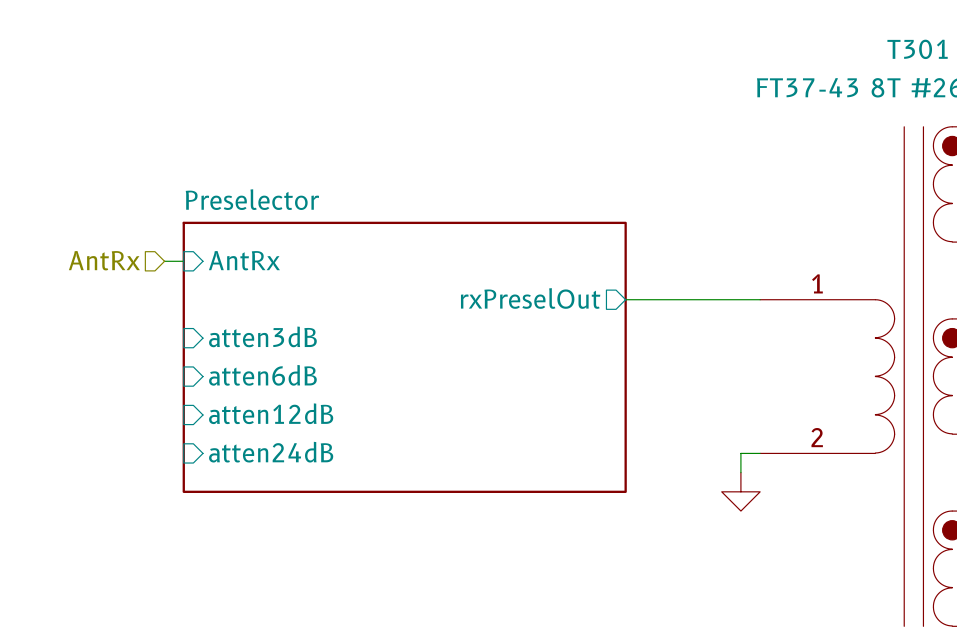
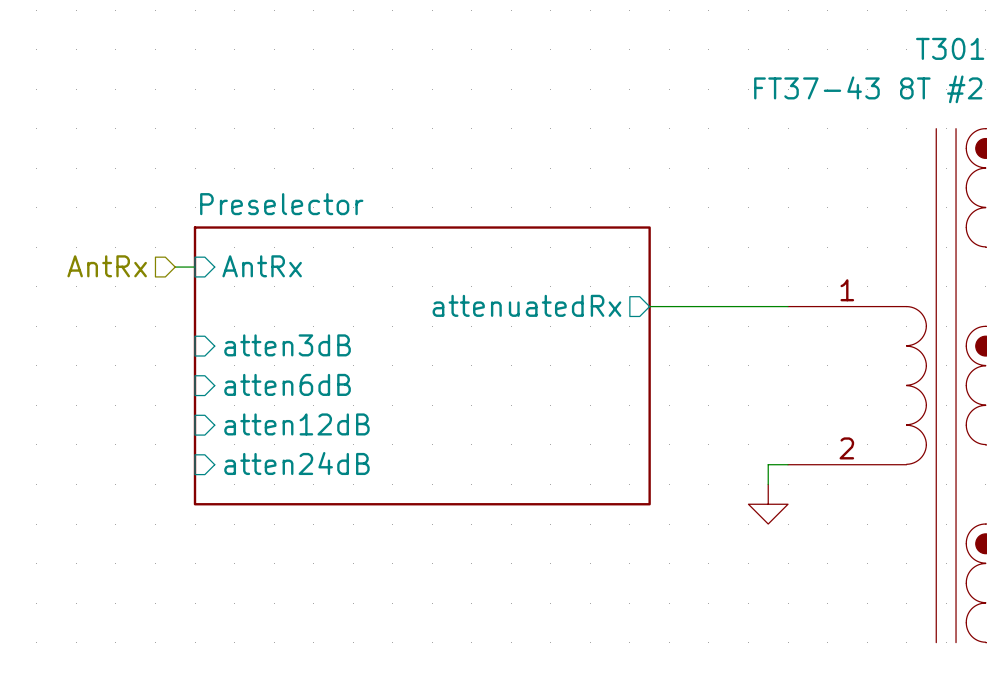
sheet pin: rxPreselOut (530, 298) -> attenuatedRx (526, 305)

